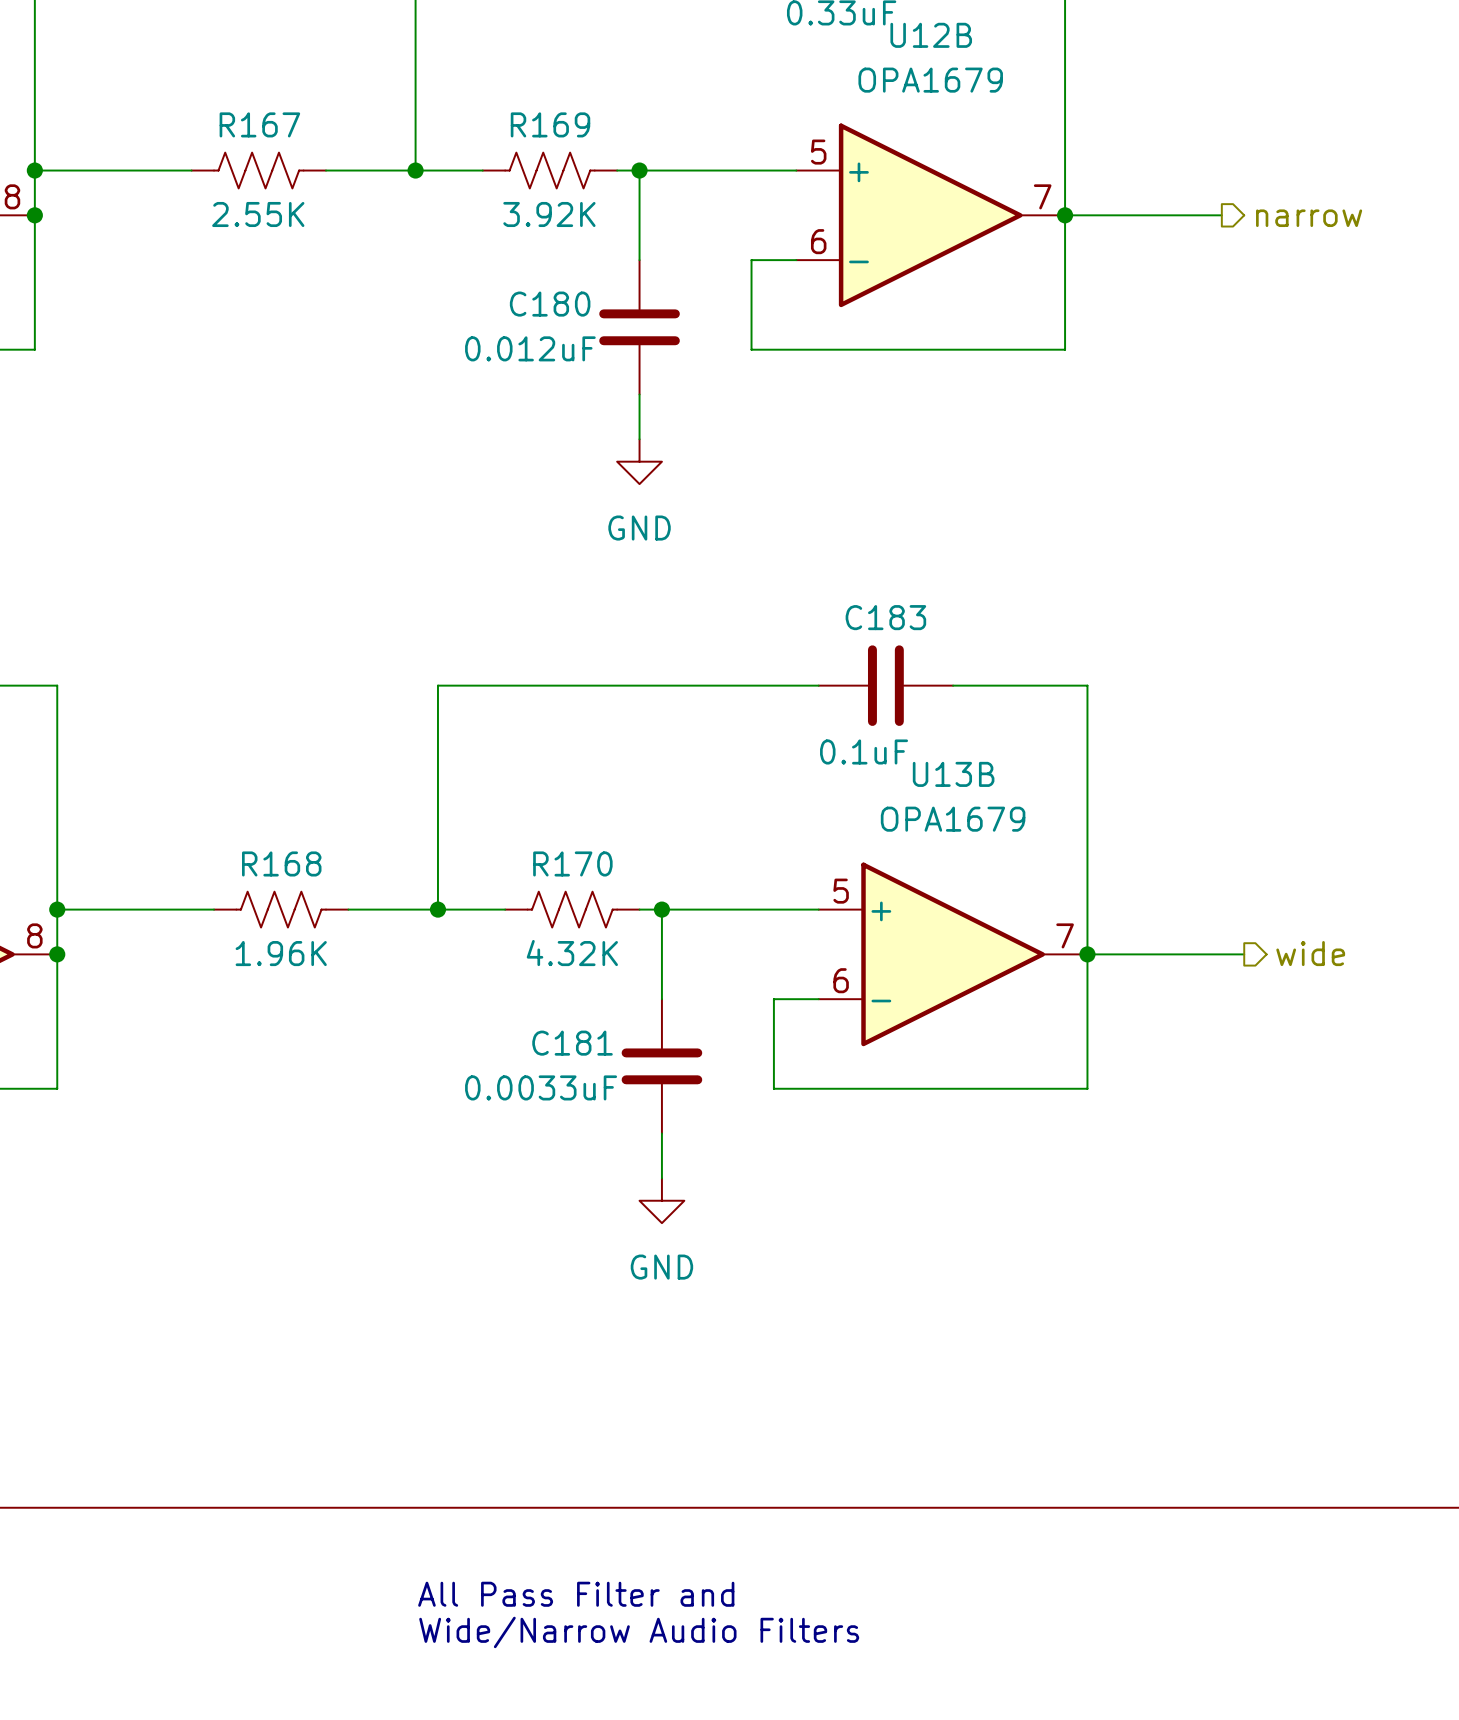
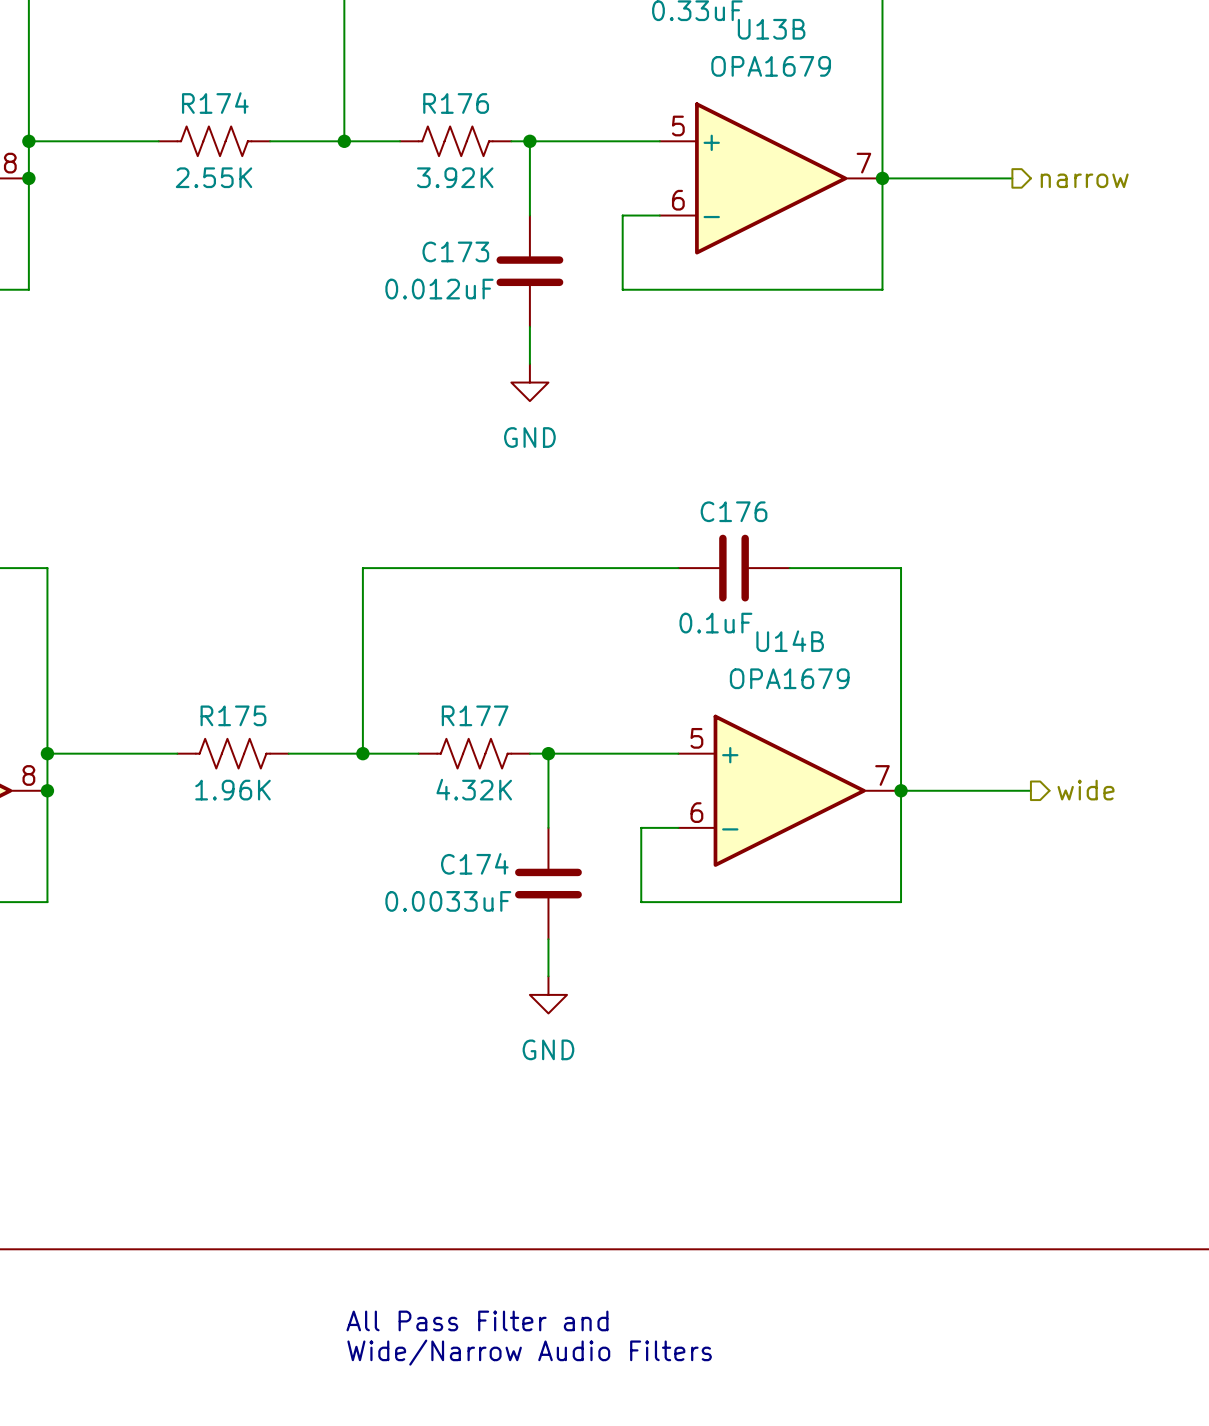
U12B name: U12B (931, 35) -> U13B (771, 29)
R167 name: R167 (259, 124) -> R174 (215, 103)
R169 name: R169 (550, 124) -> R176 (456, 103)
C180 name: C180 (550, 304) -> C173 (455, 251)
C183 name: C183 (885, 617) -> C176 (734, 511)
U13B name: U13B (953, 774) -> U14B (790, 641)
R168 name: R168 (281, 863) -> R175 (233, 715)
R170 name: R170 (572, 863) -> R177 (475, 715)
C181 name: C181 (572, 1043) -> C174 (474, 863)

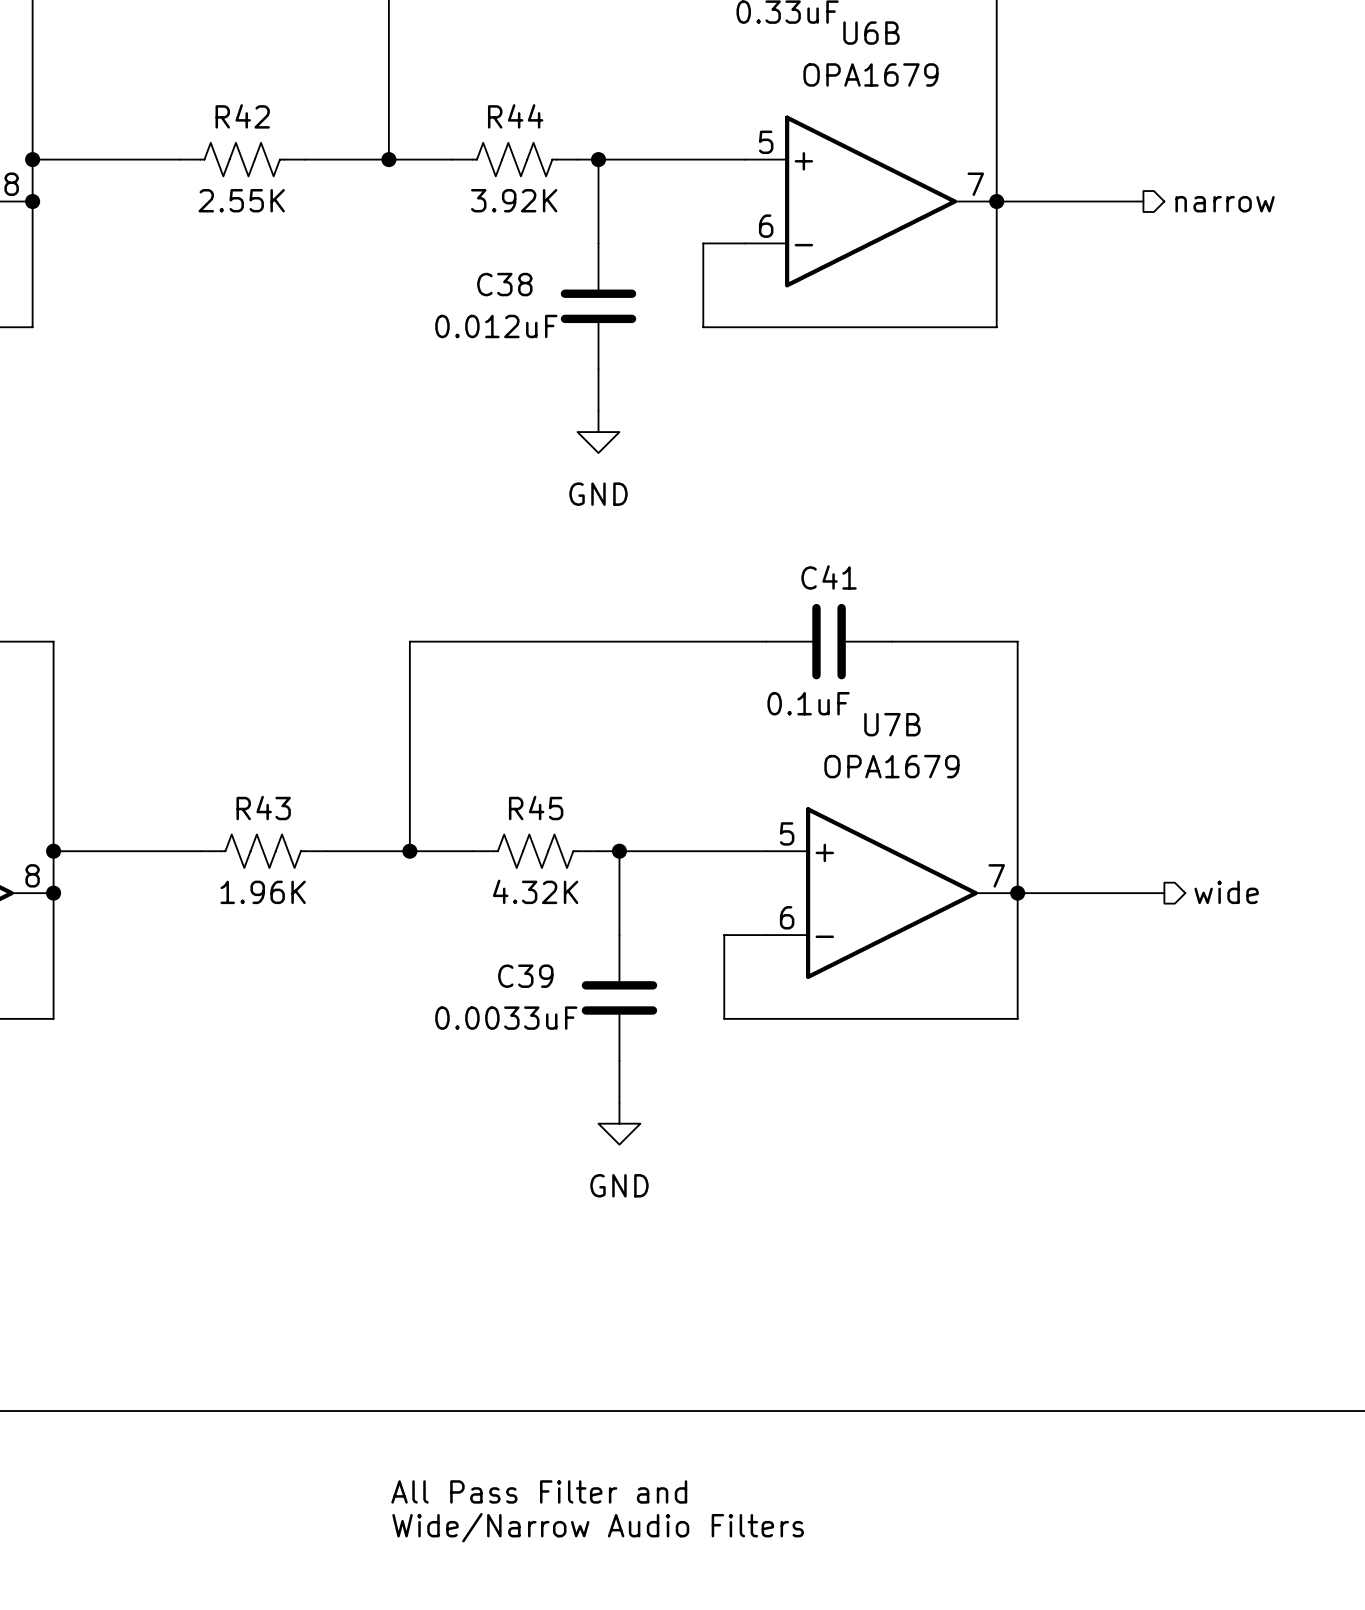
U13B name: U13B (771, 29) -> U6B (871, 33)
R174 name: R174 (215, 103) -> R42 (242, 116)
R176 name: R176 (456, 103) -> R44 (515, 116)
C173 name: C173 (455, 251) -> C38 (504, 284)
C176 name: C176 (734, 511) -> C41 (829, 577)
U14B name: U14B (790, 641) -> U7B (892, 724)
R175 name: R175 (233, 715) -> R43 (263, 808)
R177 name: R177 (475, 715) -> R45 (536, 808)
C174 name: C174 (474, 863) -> C39 (525, 976)

